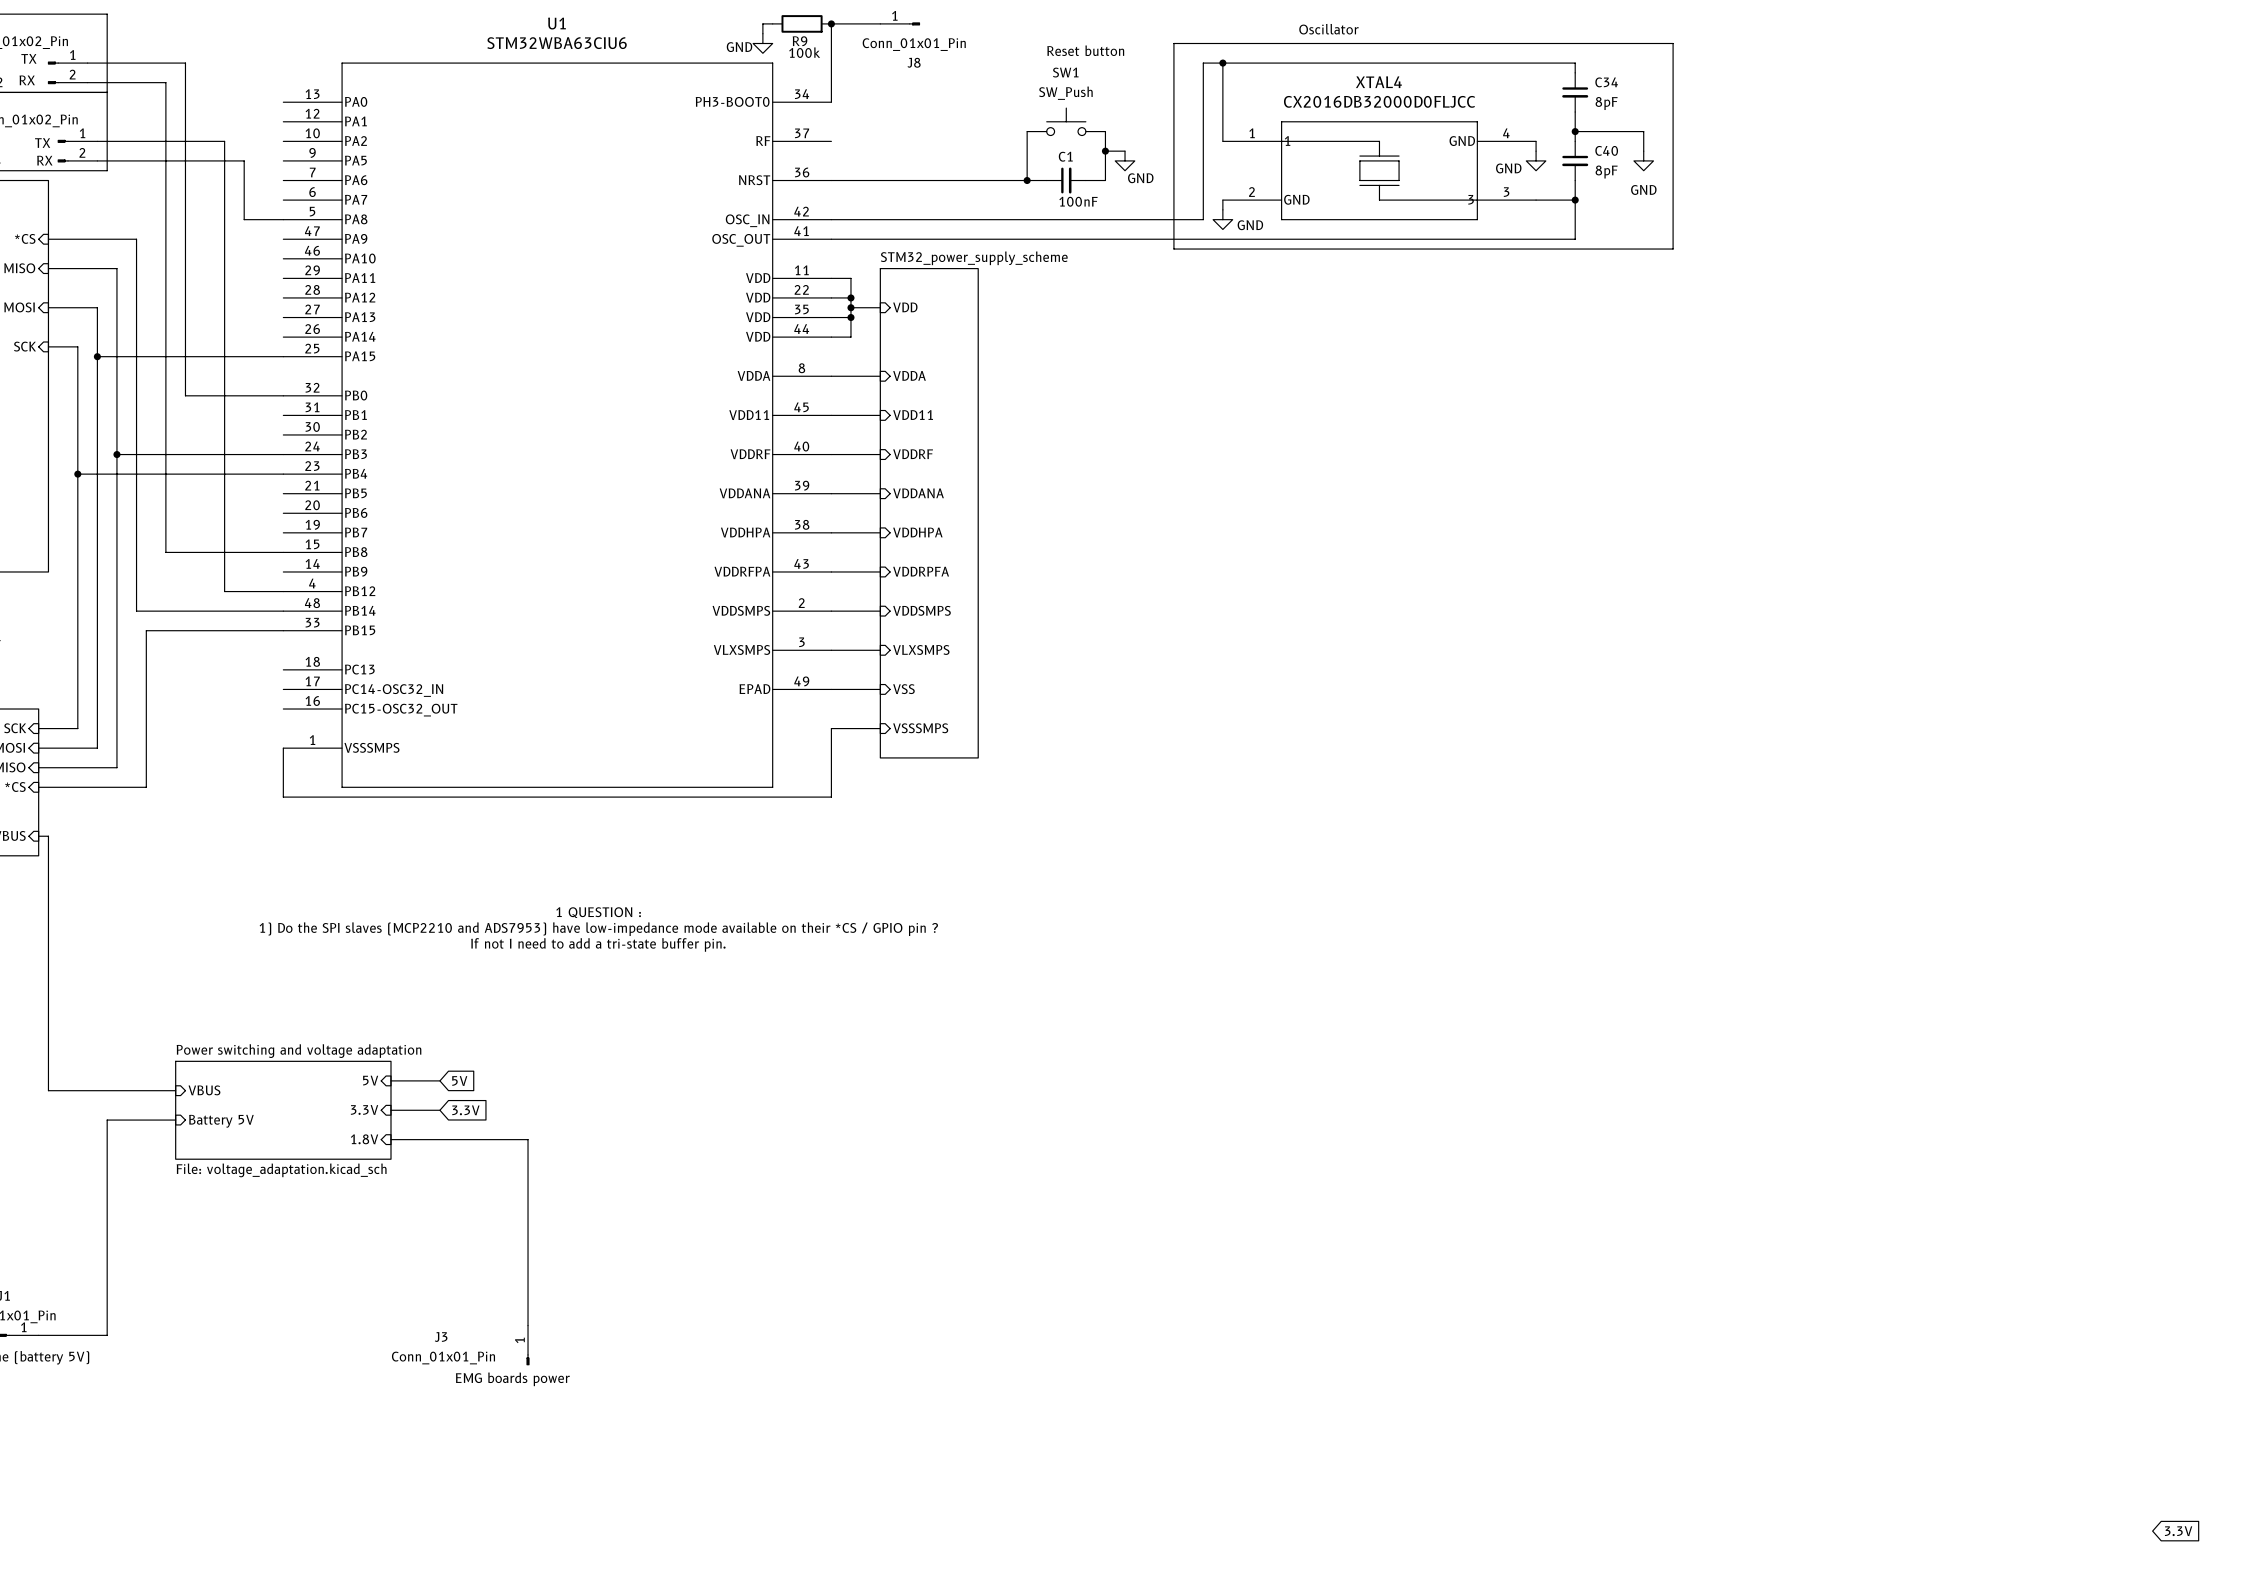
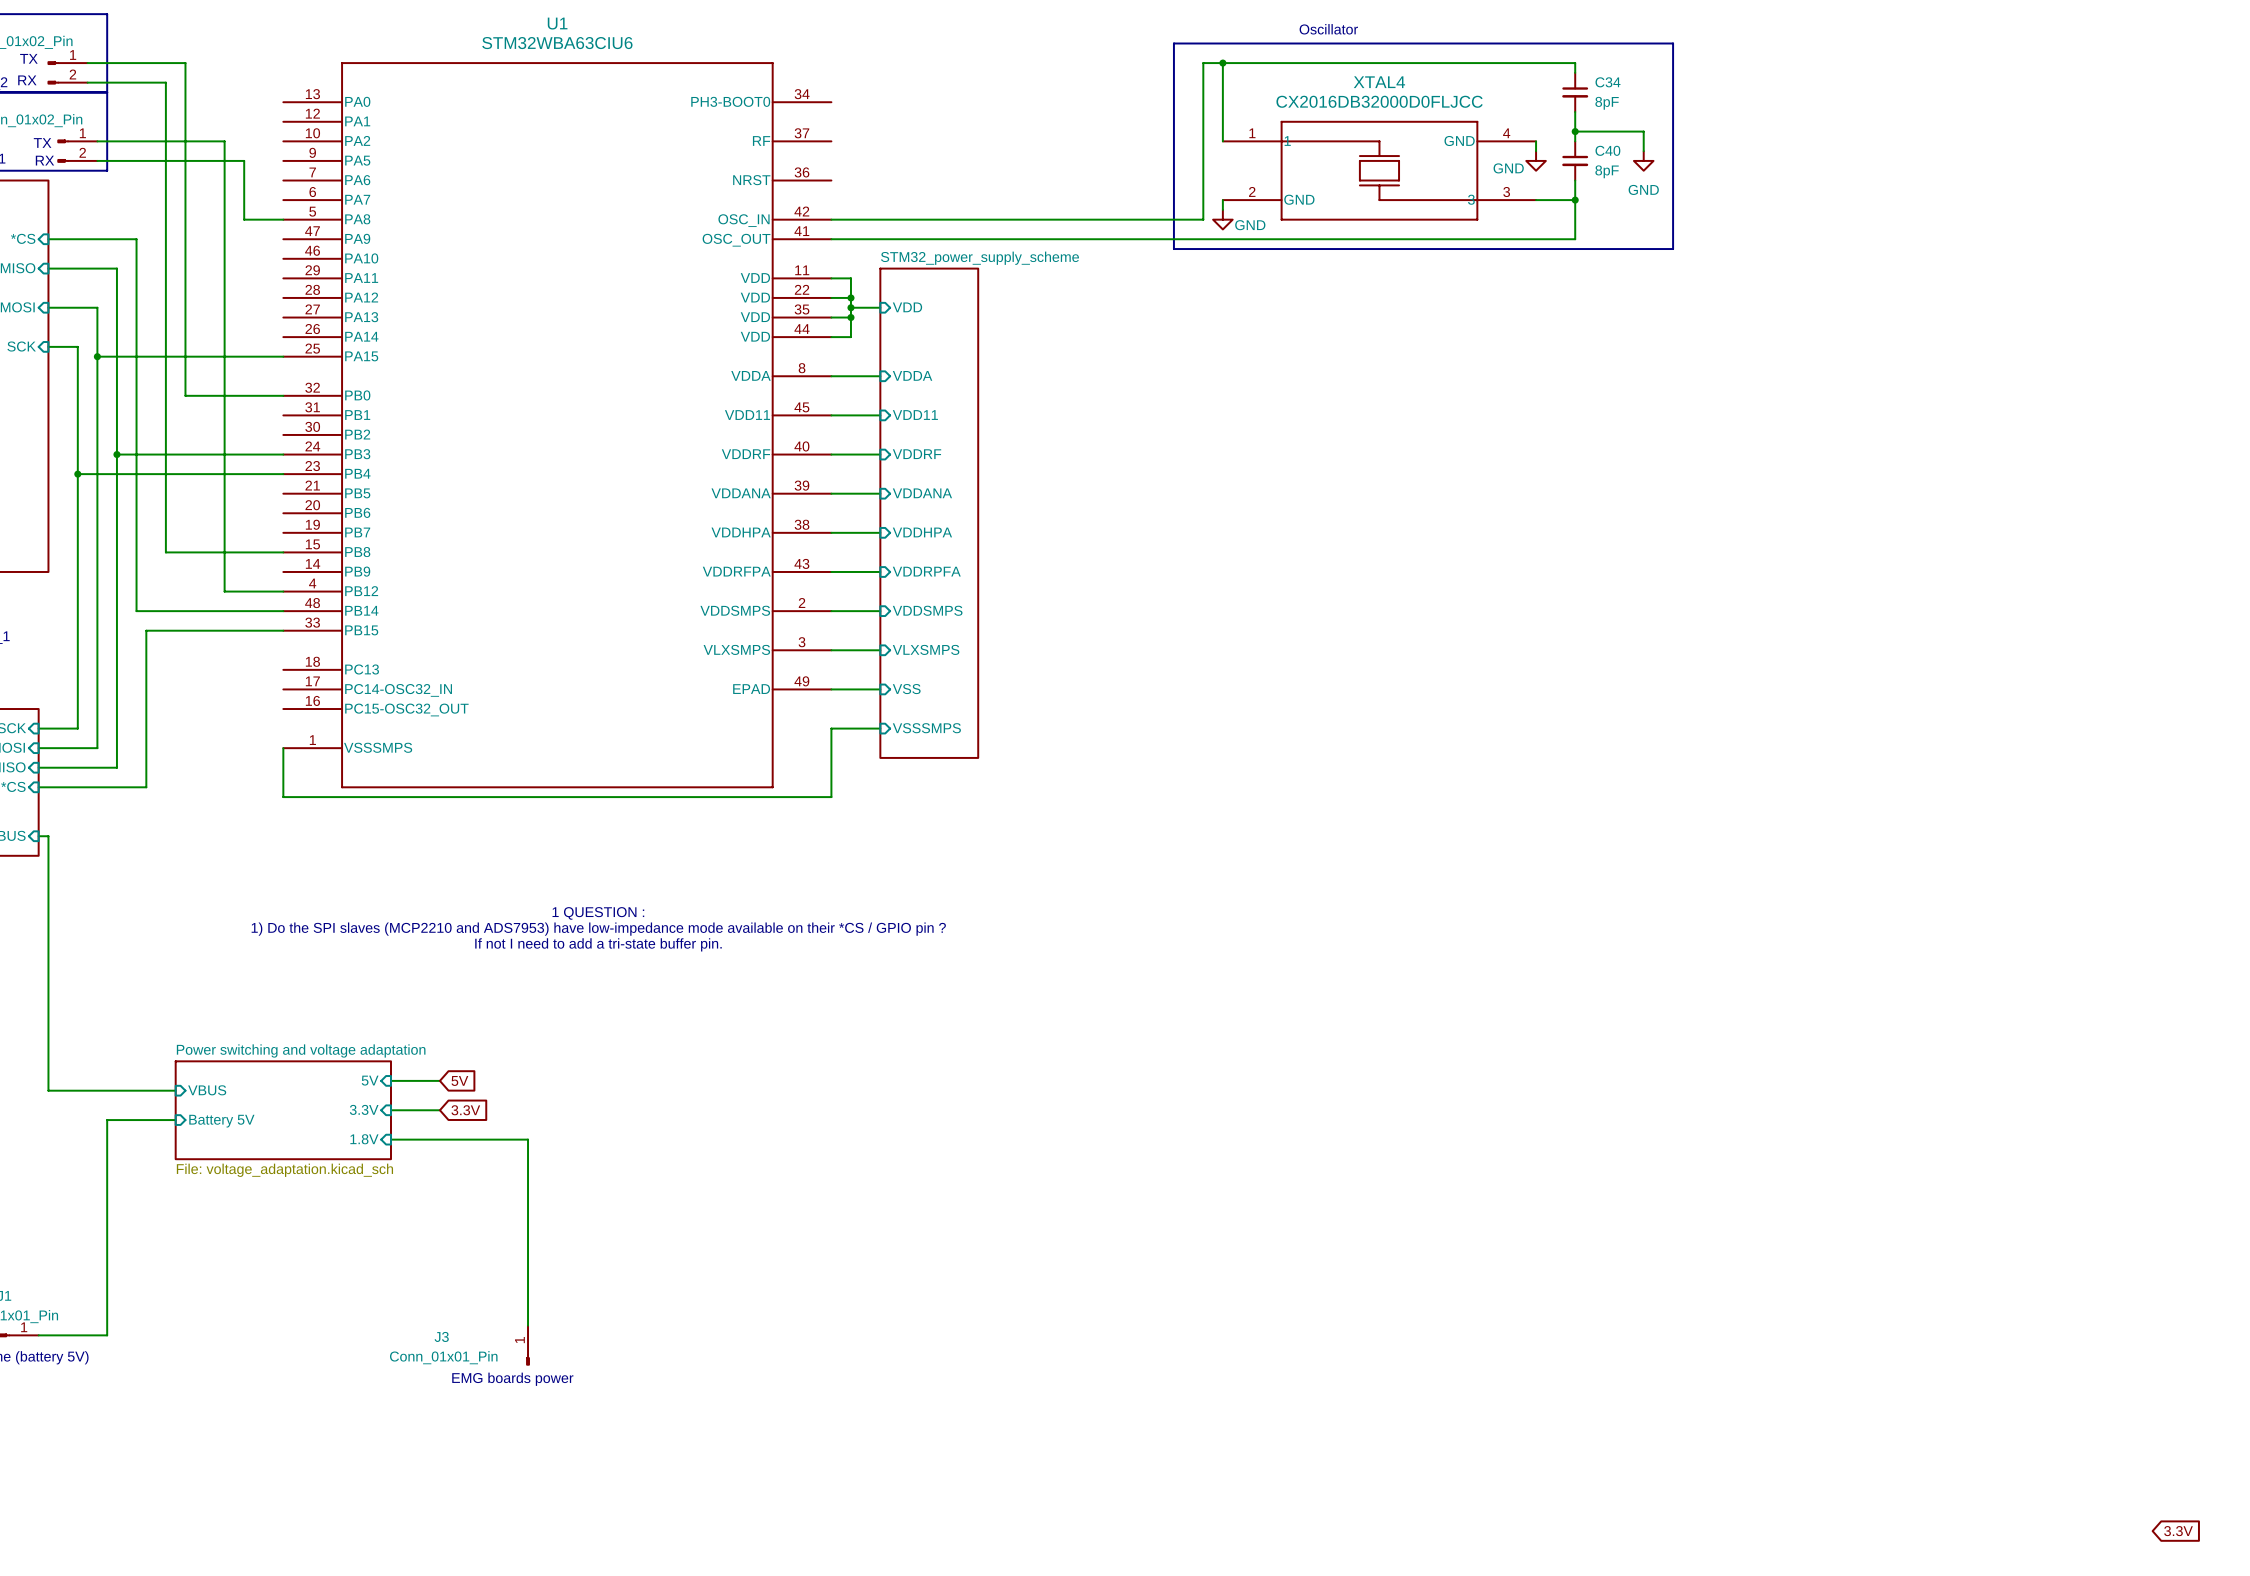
wire: (772, 23) (762, 23) (762, 33) -> none
R9: 100k (802, 23) -> none
junction: (831, 23) -> none
wire: (880, 23) (831, 23) (831, 102) -> none
J8: Conn_01x01_Pin (900, 23) -> none
power symbol: GND (762, 43) -> none
text: Reset button (1085, 50) -> none
SW1: SW_Push (1066, 121) -> none
wire: (1027, 131) (1027, 180) -> none
wire: (1105, 131) (1105, 180) (1085, 180) -> none
wire: (1105, 151) (1125, 151) -> none
junction: (1105, 151) -> none
power symbol: GND (1125, 160) -> none
wire: (831, 180) (1046, 180) -> none
junction: (1027, 180) -> none
C1: 100nF (1066, 180) -> none

